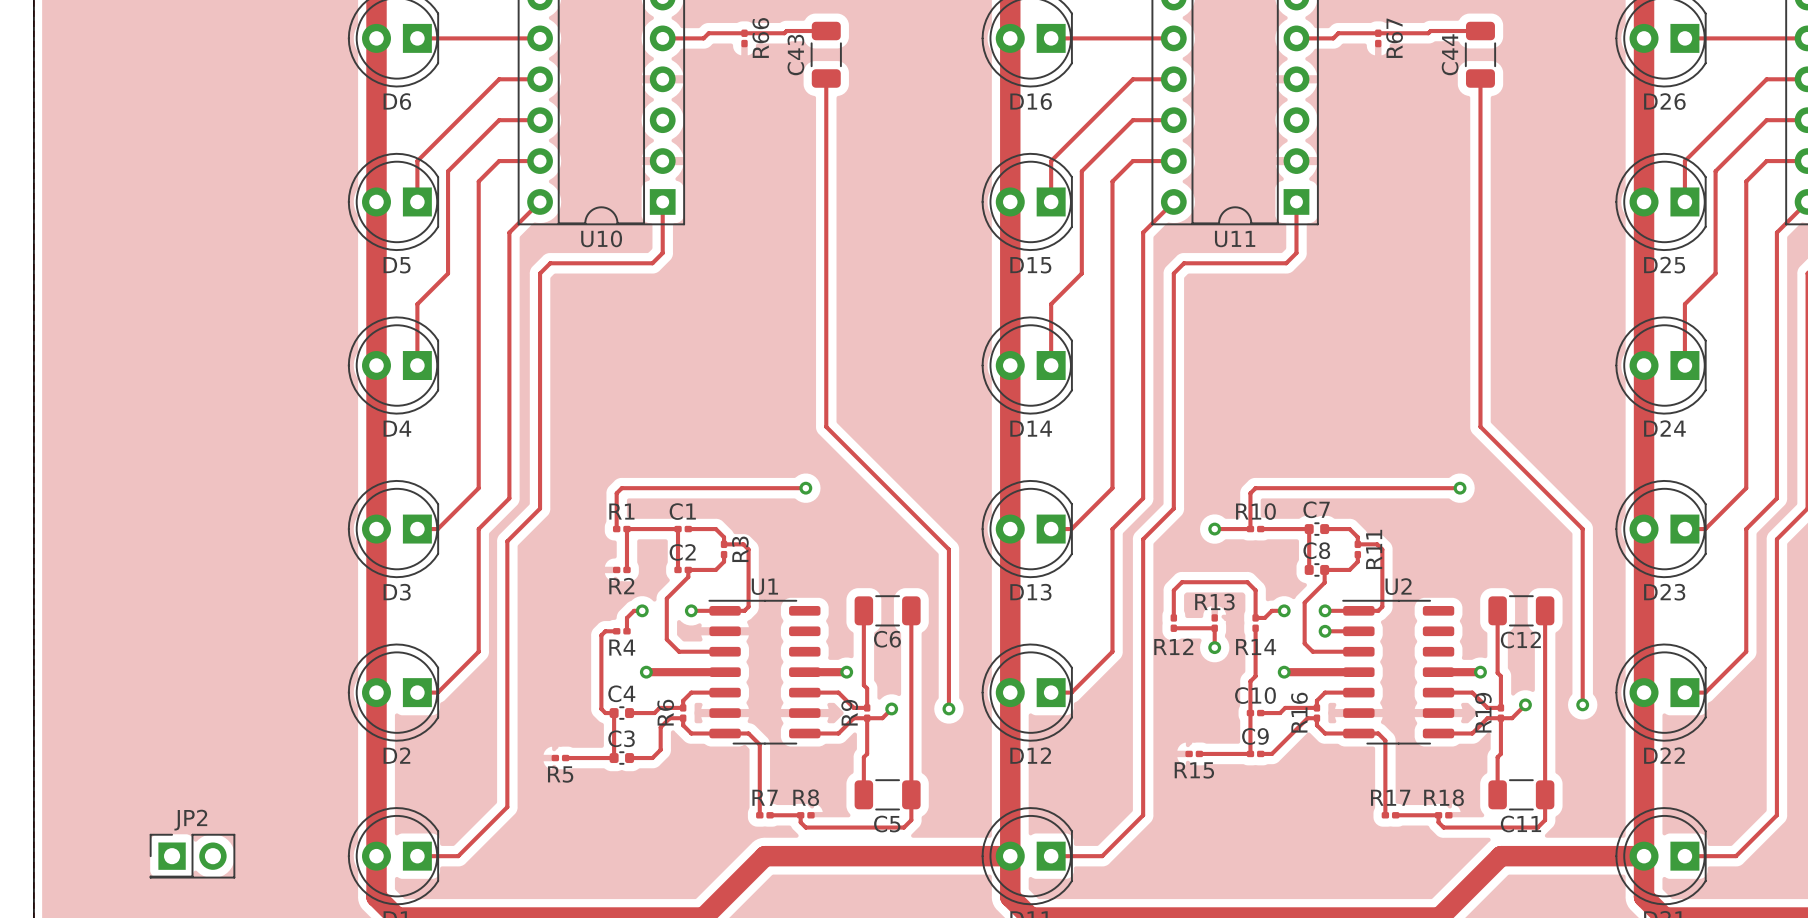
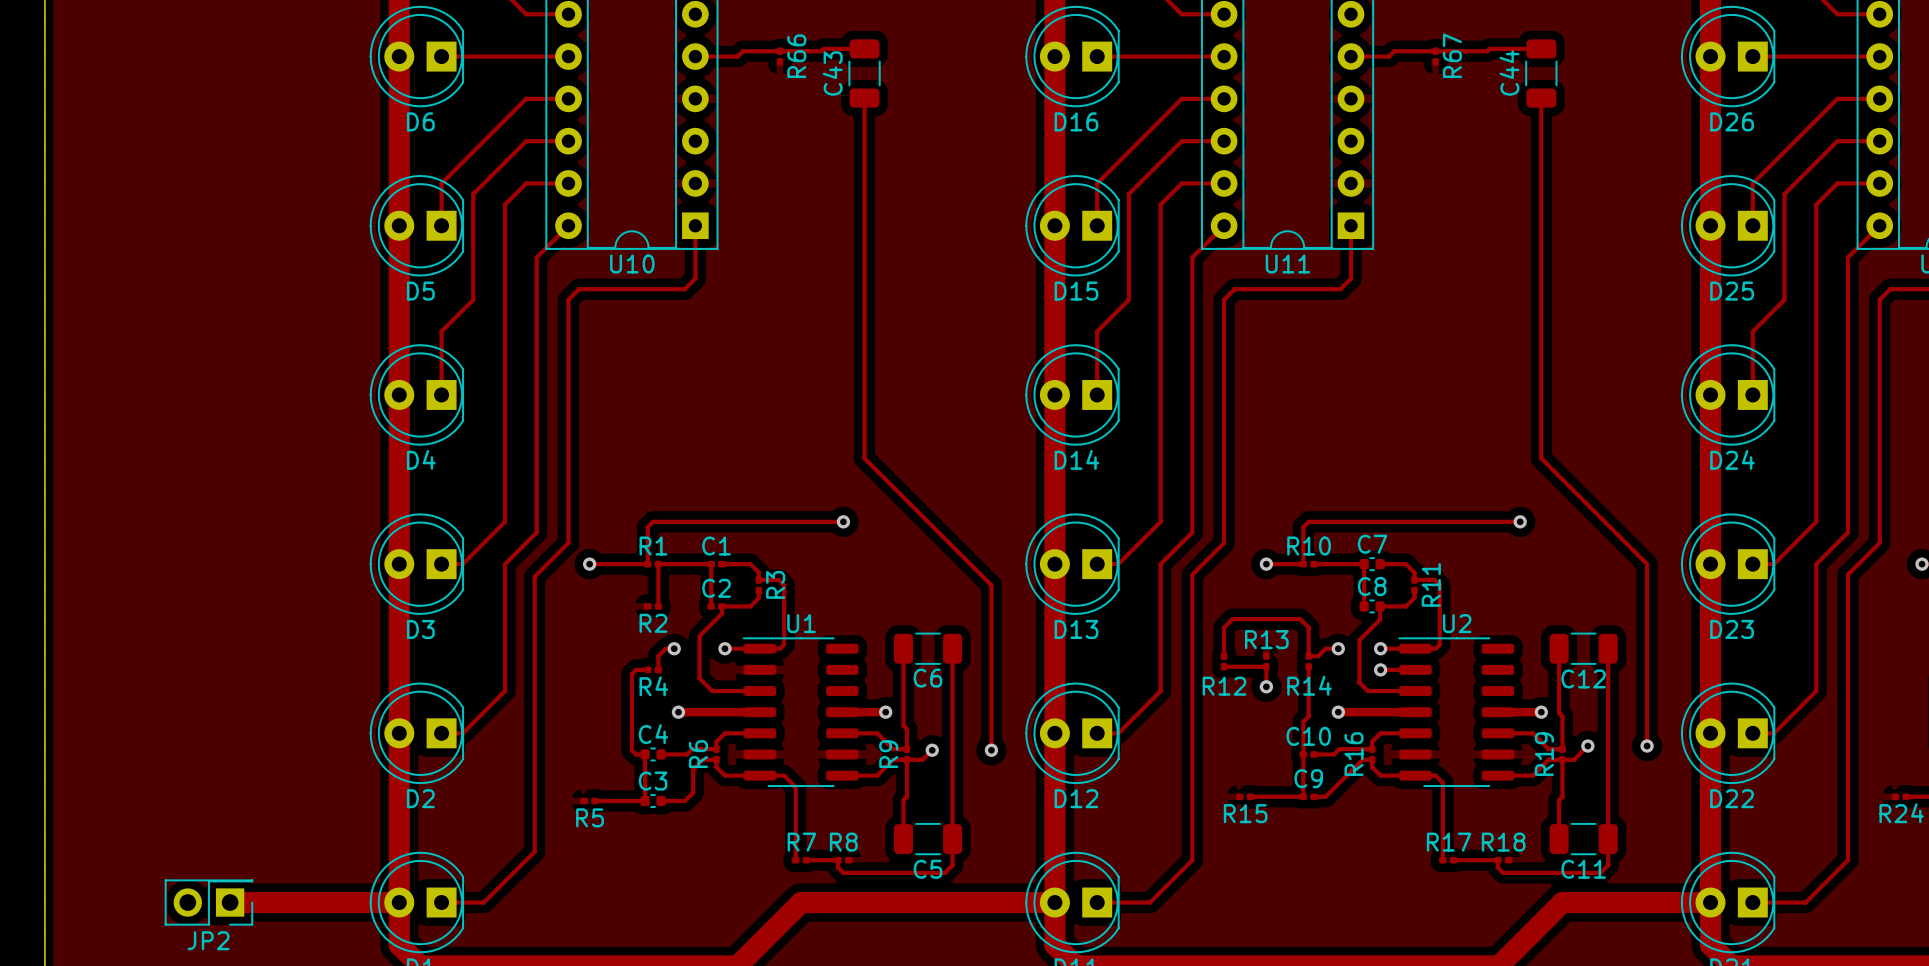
track: none -> (589, 564) (647, 564)
via: none -> (589, 564)
JP2 rotation: 0° (192, 856) -> 180° (208, 902)
track: none -> (230, 902) (399, 902)

